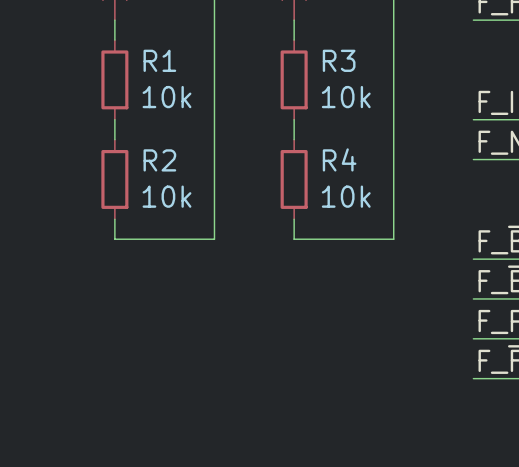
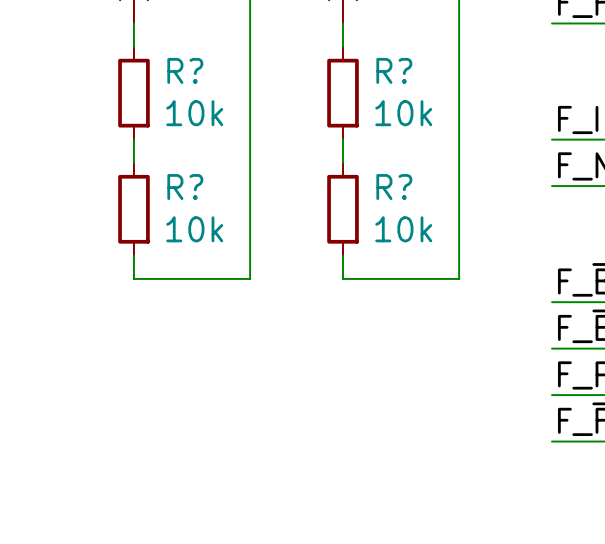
R1 name: R1 (159, 60) -> R? (185, 70)
R3 name: R3 (339, 60) -> R? (394, 70)
R4 name: R4 (339, 159) -> R? (394, 187)
R2 name: R2 (159, 160) -> R? (185, 187)

